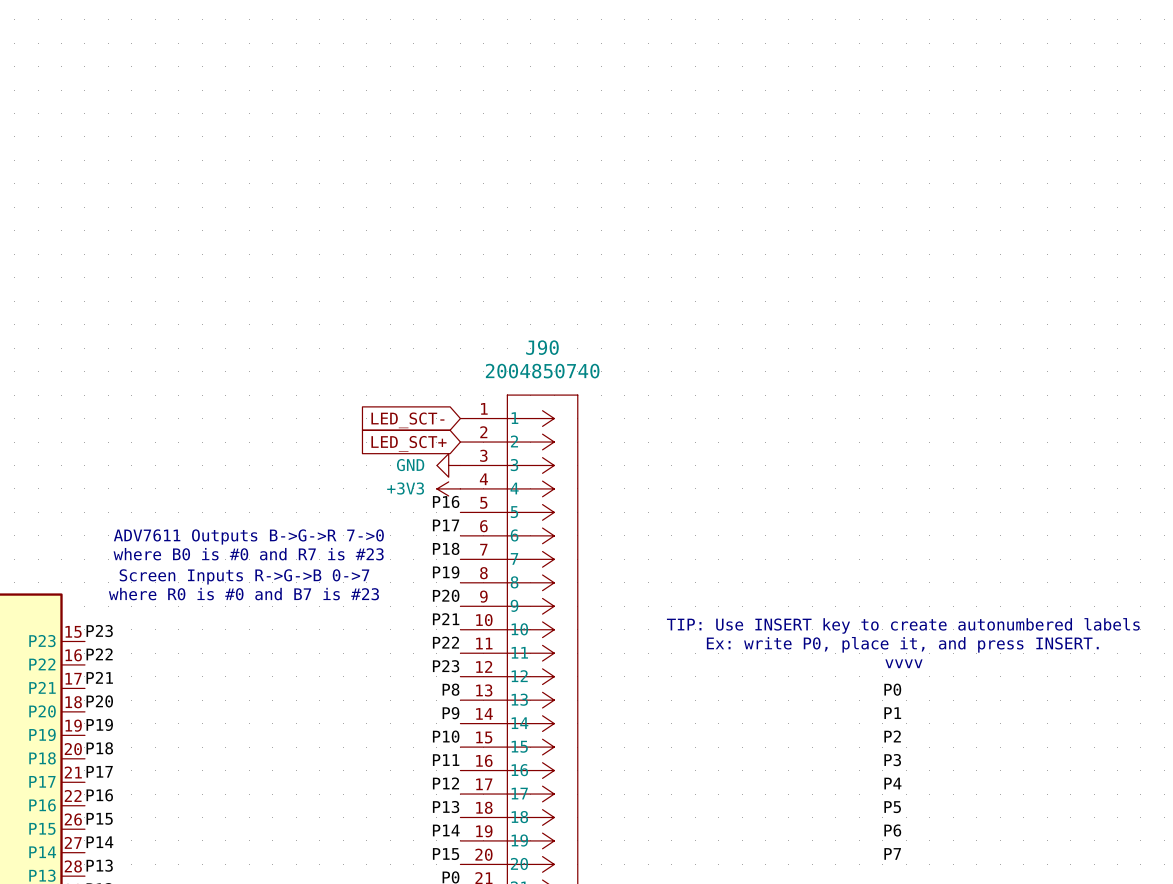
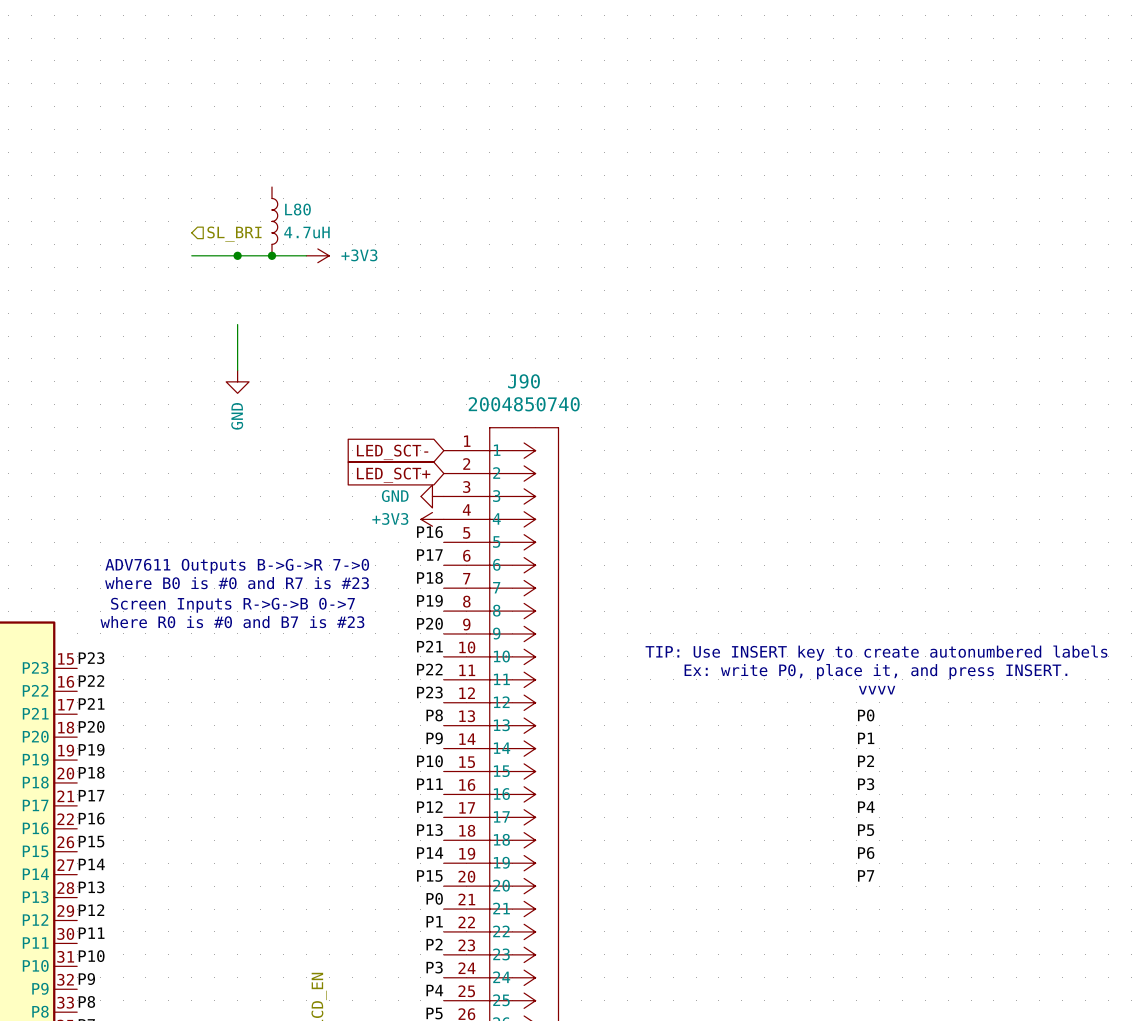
L80: none -> 4.7uH (274, 221)
hierarchical label: none -> SL_BRI (234, 234)
wire: none -> (191, 255) (306, 255)
junction: none -> (237, 255)
junction: none -> (271, 255)
power symbol: none -> +3V3 (317, 255)
wire: none -> (237, 324) (237, 370)
power symbol: none -> GND (237, 381)

